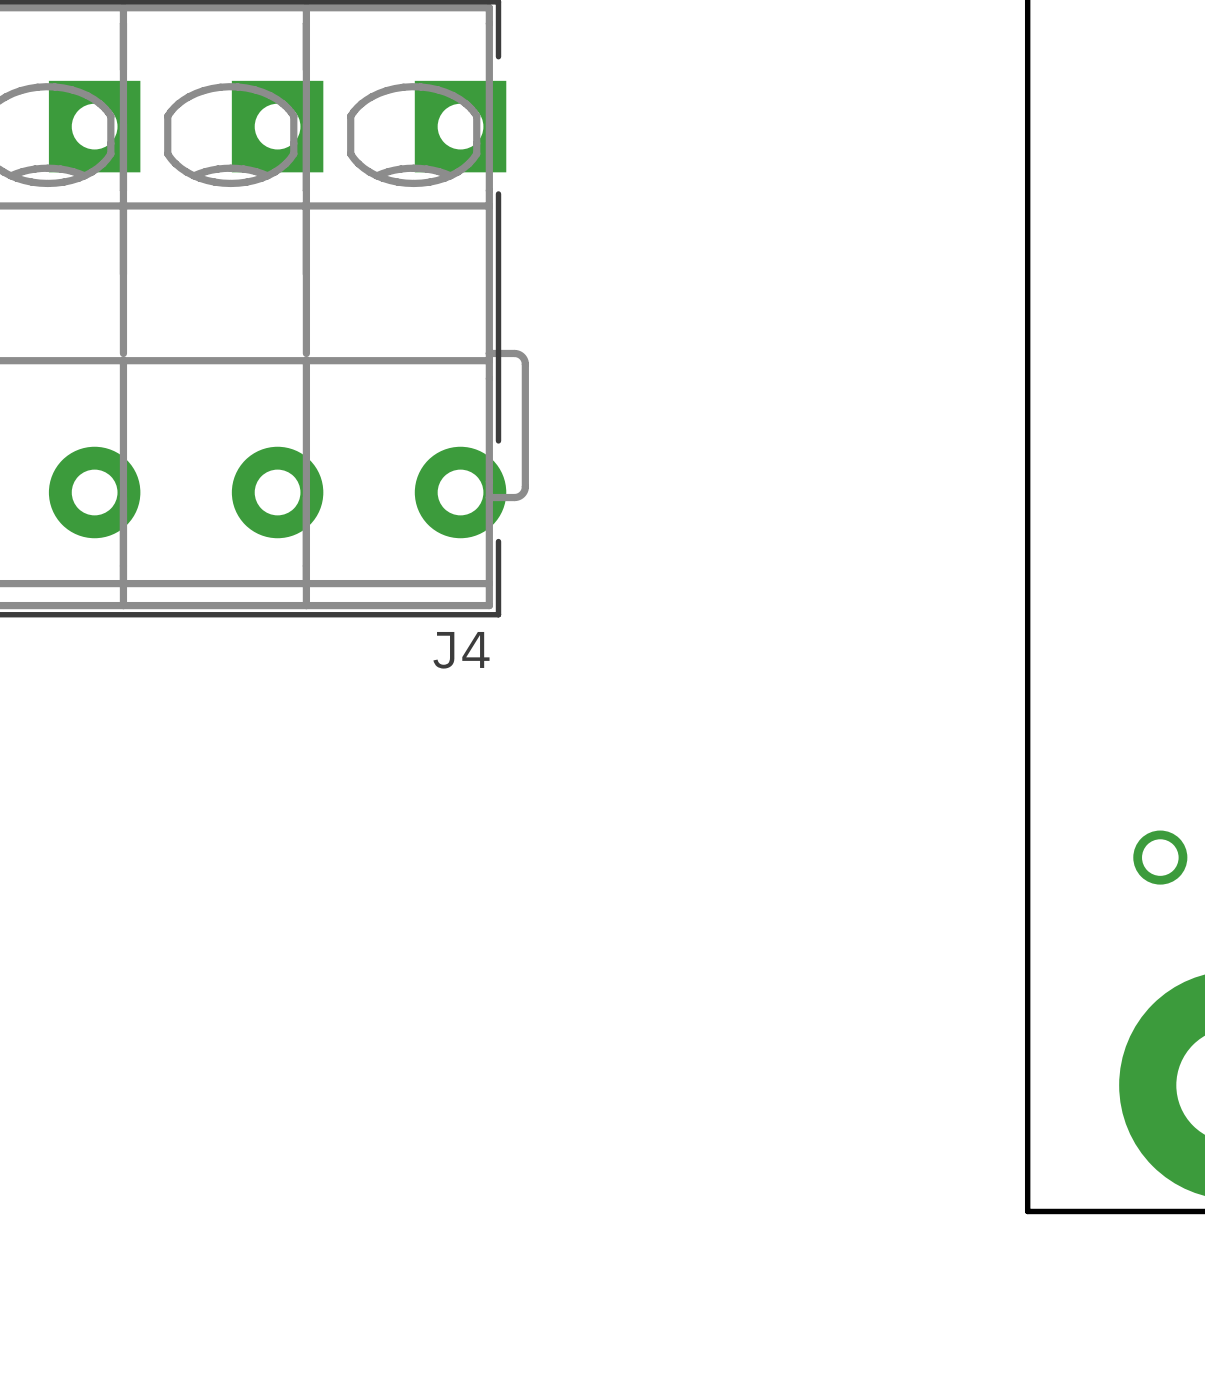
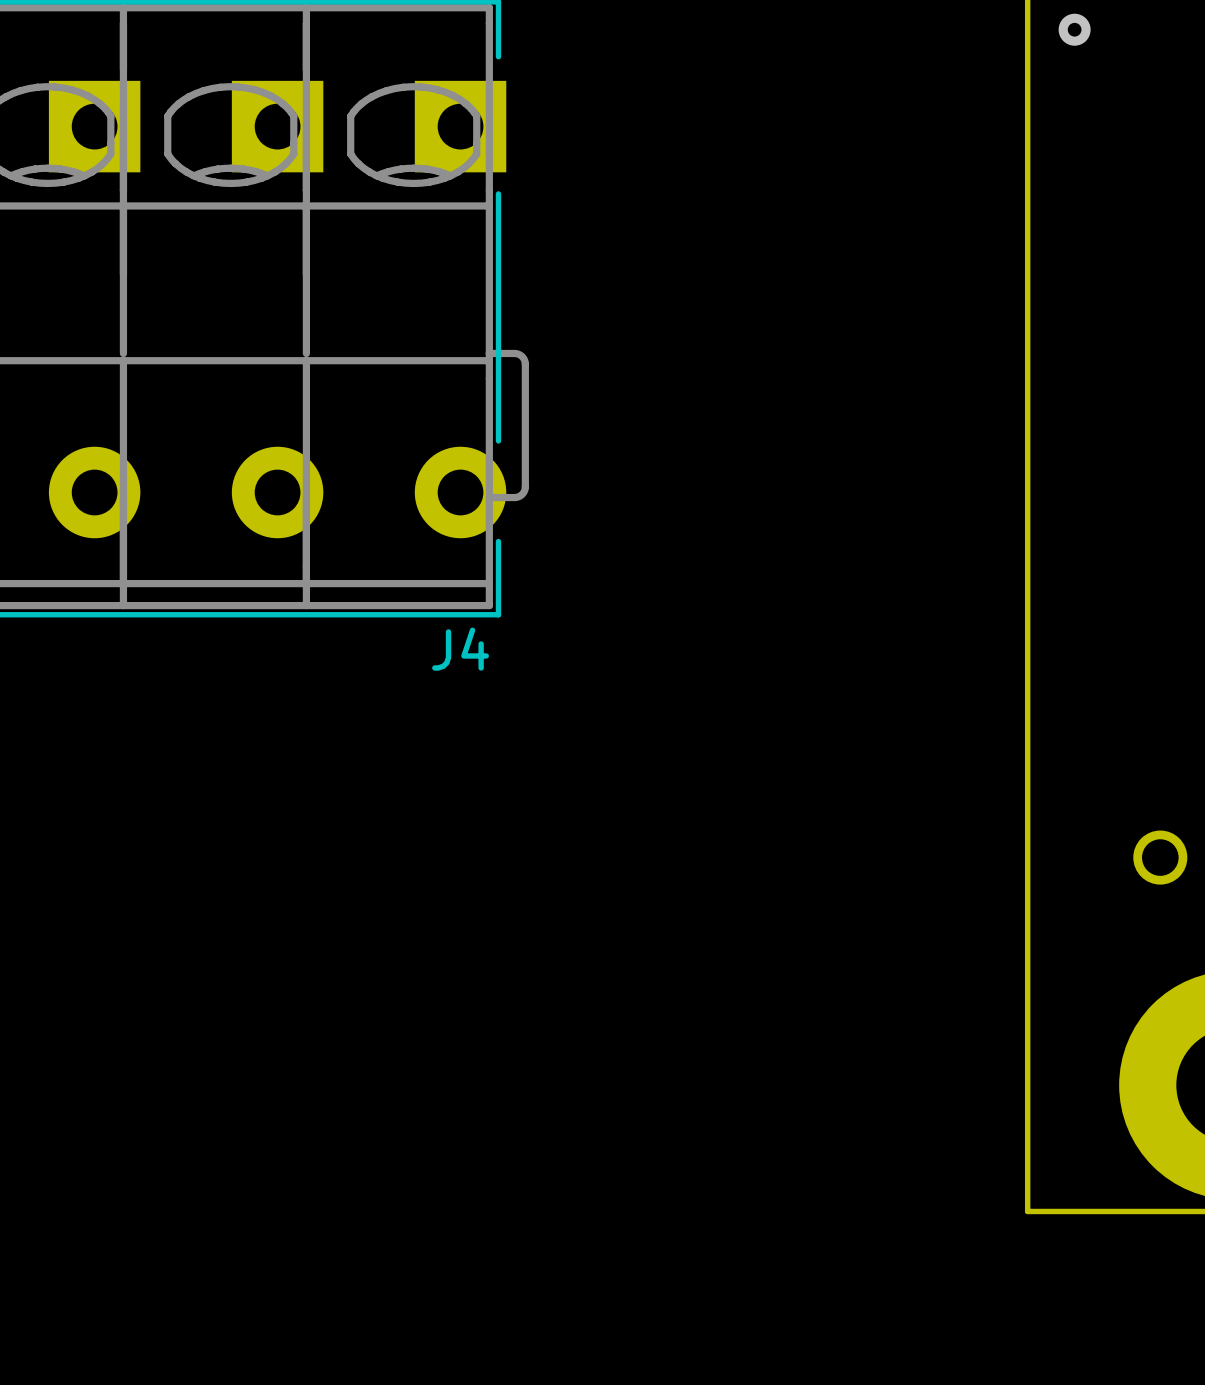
via: none -> (1074, 29)

